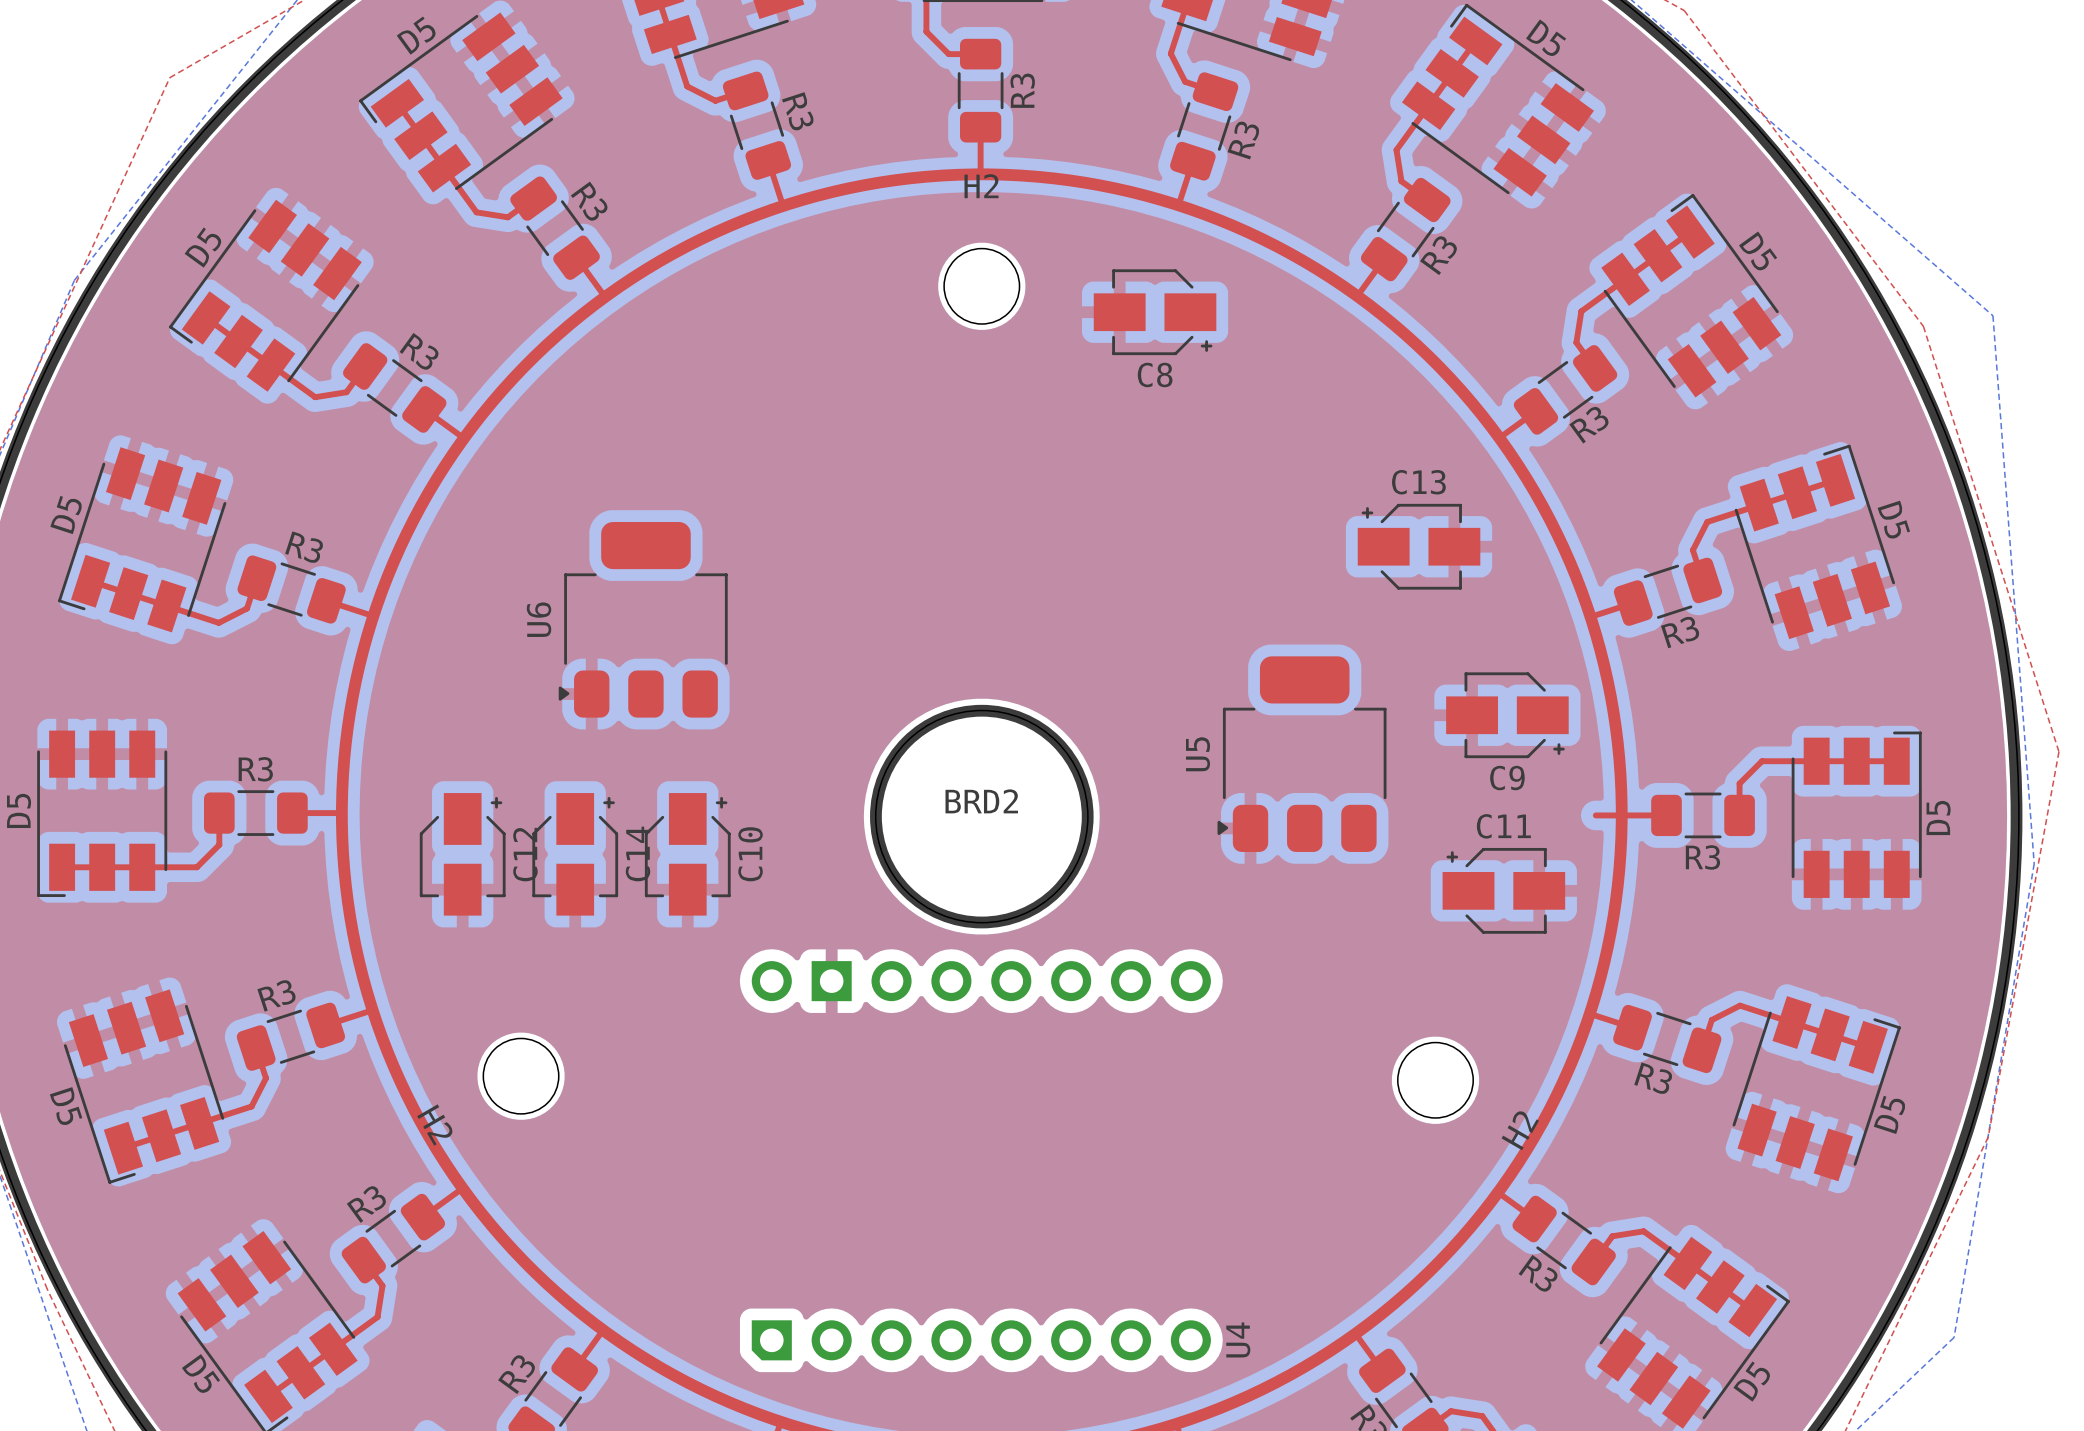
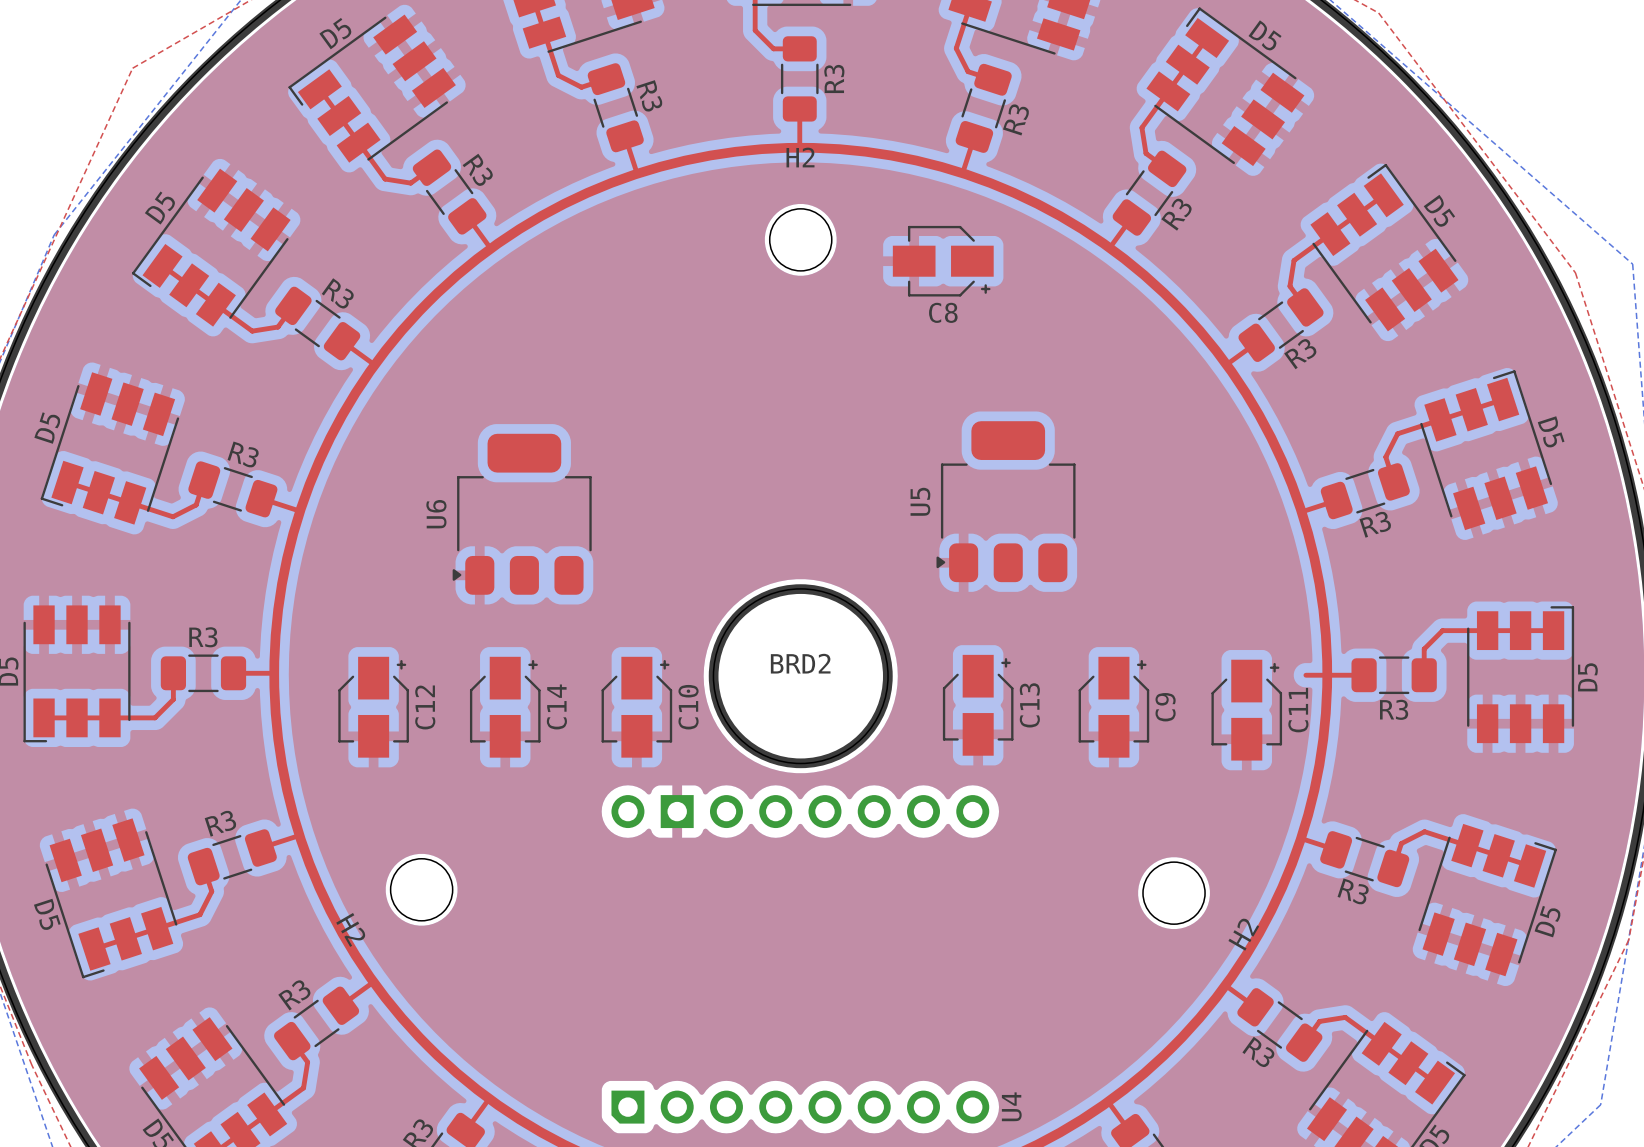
C13 rotation: 0° (1419, 546) -> 90° clockwise (978, 705)
C13 position: (1419, 546) -> (978, 705)
C9 rotation: 0° (1507, 715) -> 90° counterclockwise (1113, 707)
C9 position: (1507, 715) -> (1113, 707)
U5 position: (1302, 754) -> (1006, 501)
C14 position: (575, 854) -> (505, 707)
C10 position: (687, 854) -> (636, 707)
C11 rotation: 0° (1503, 890) -> 90° clockwise (1246, 710)

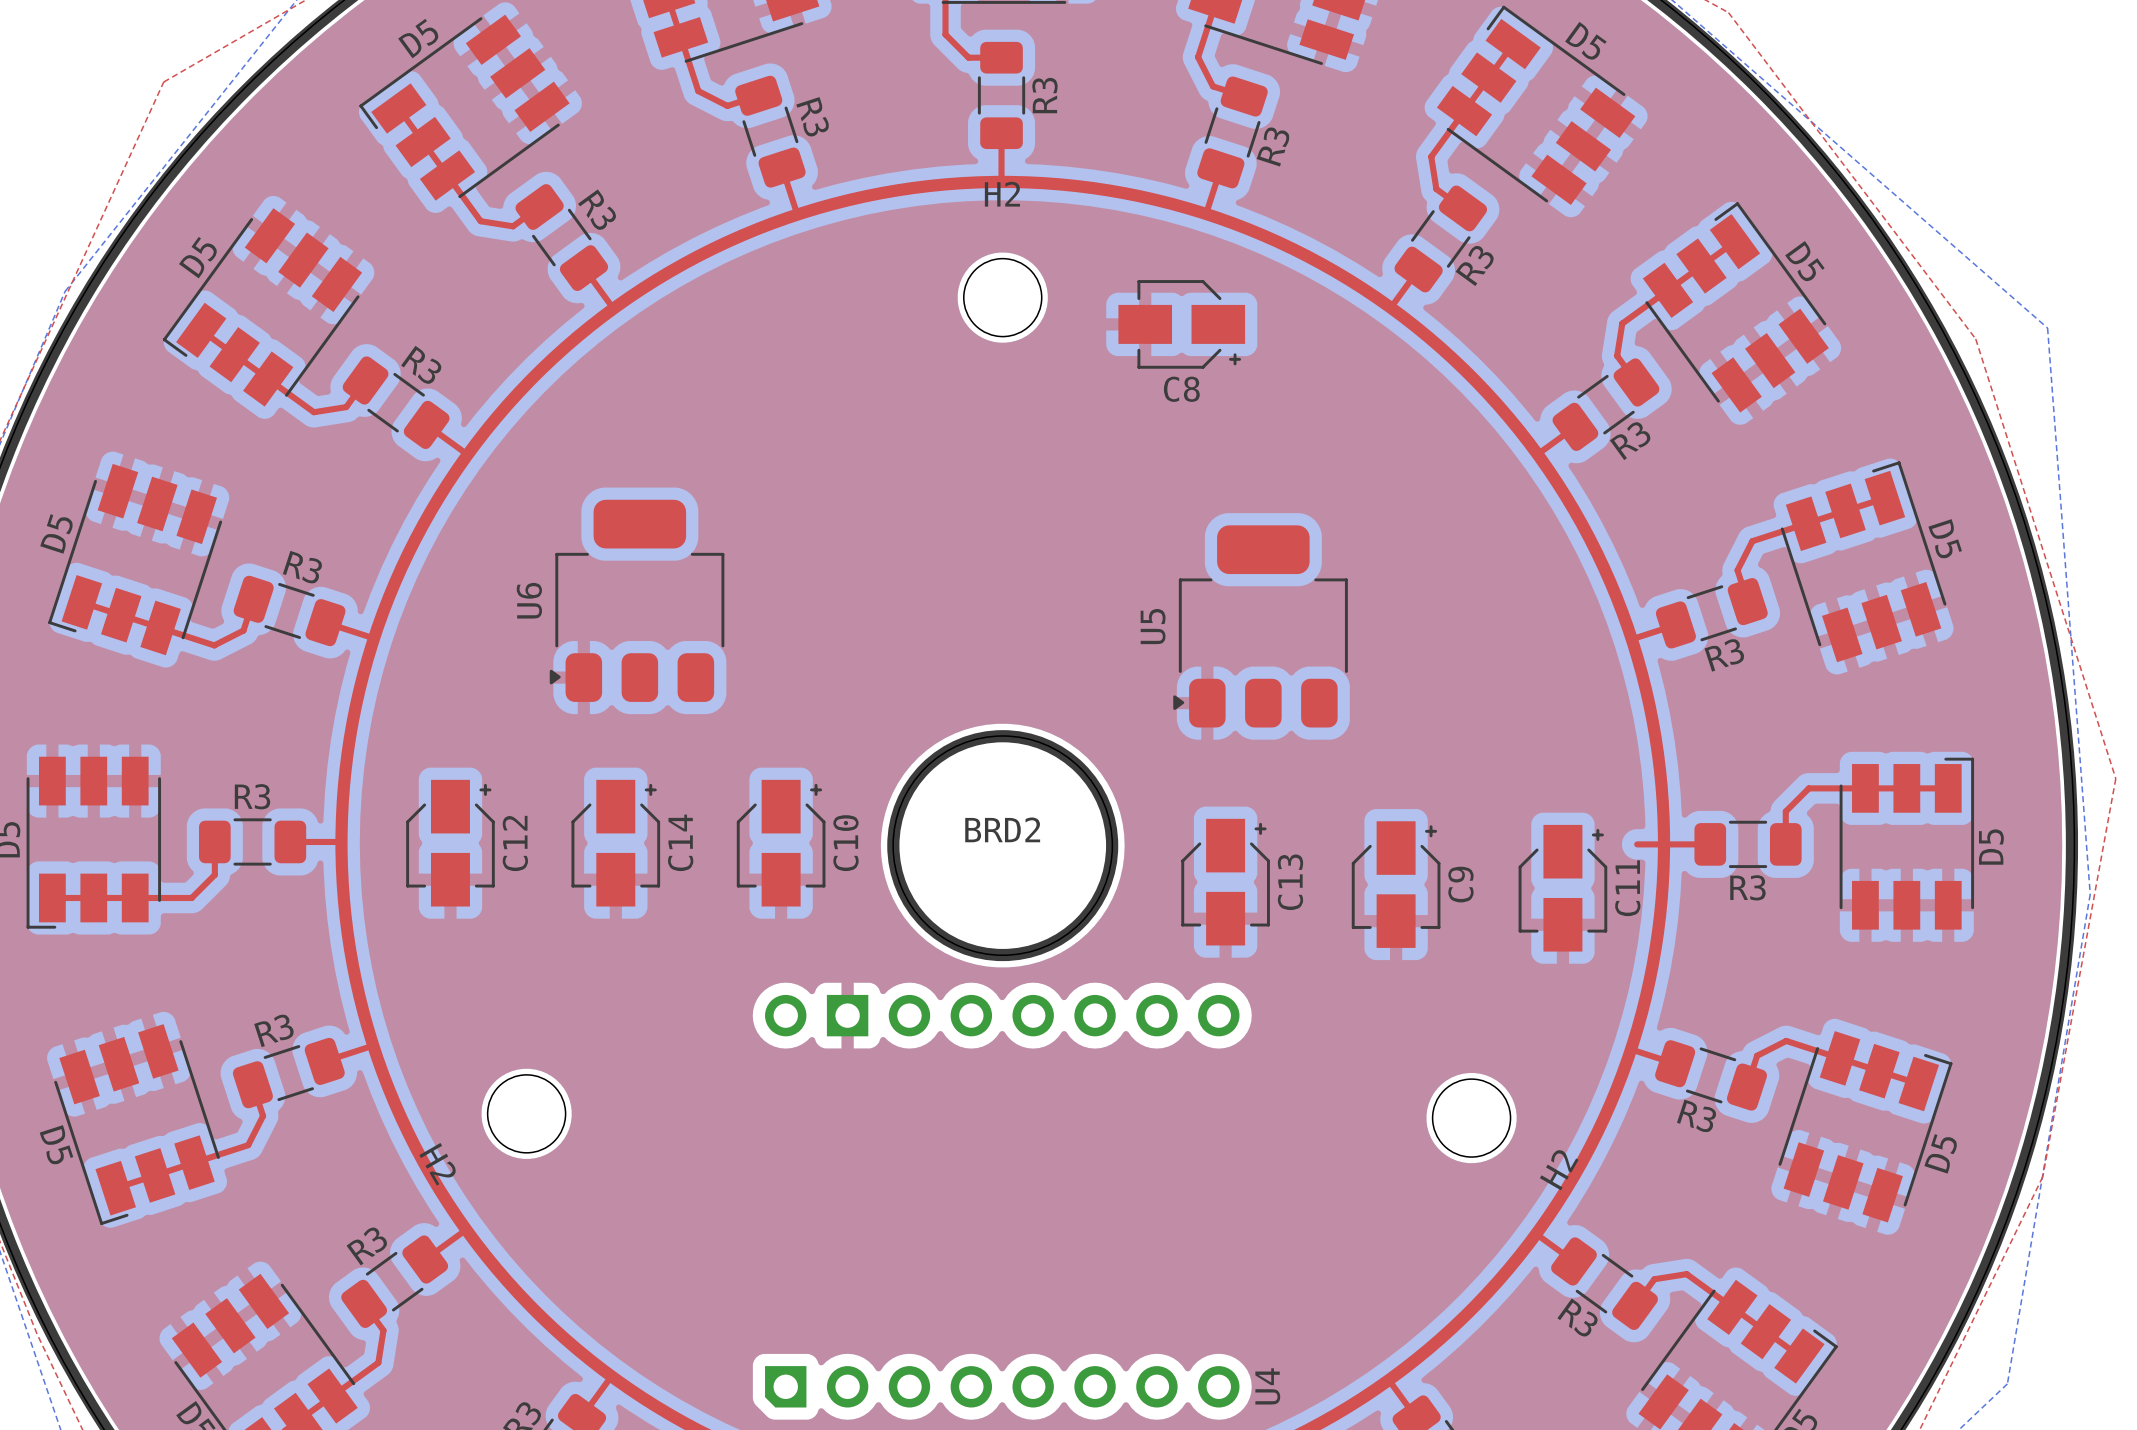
U6 position: (522, 514) -> (637, 600)
C12 position: (373, 707) -> (450, 843)
C14 position: (505, 707) -> (615, 843)
C10 position: (636, 707) -> (781, 843)

